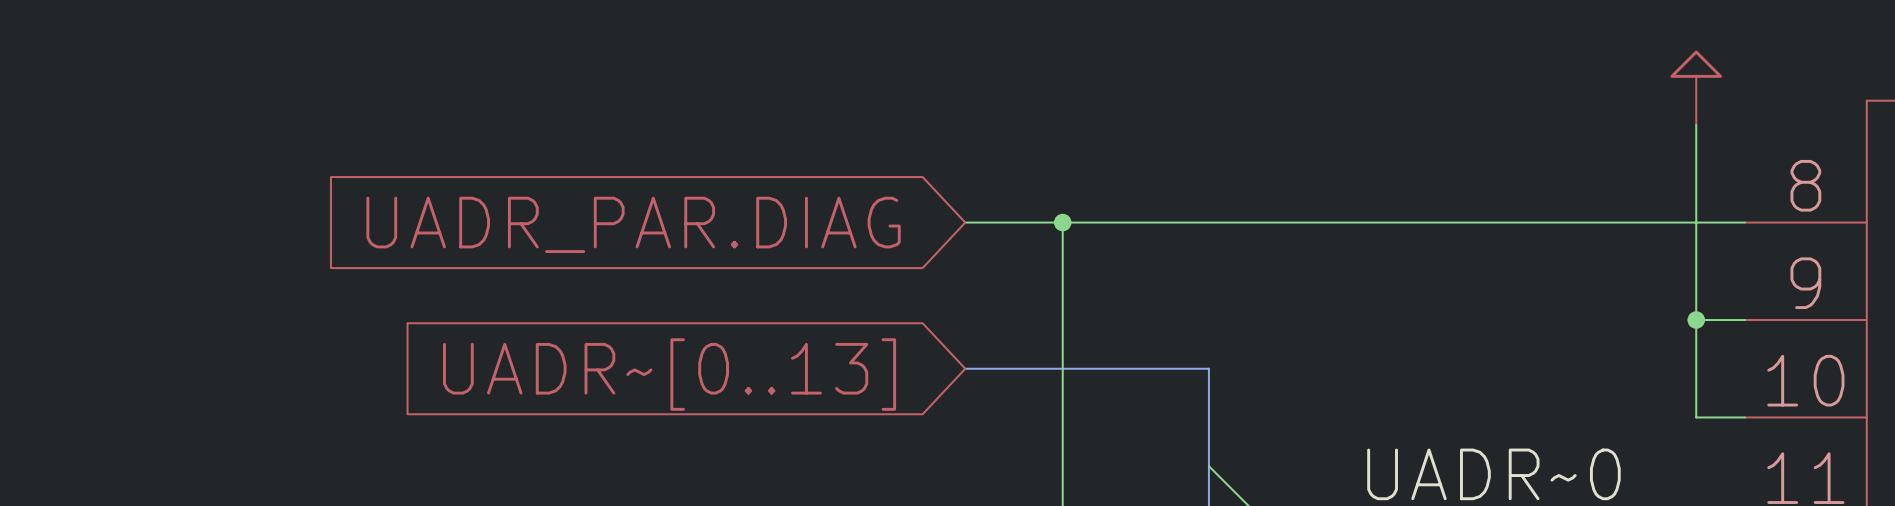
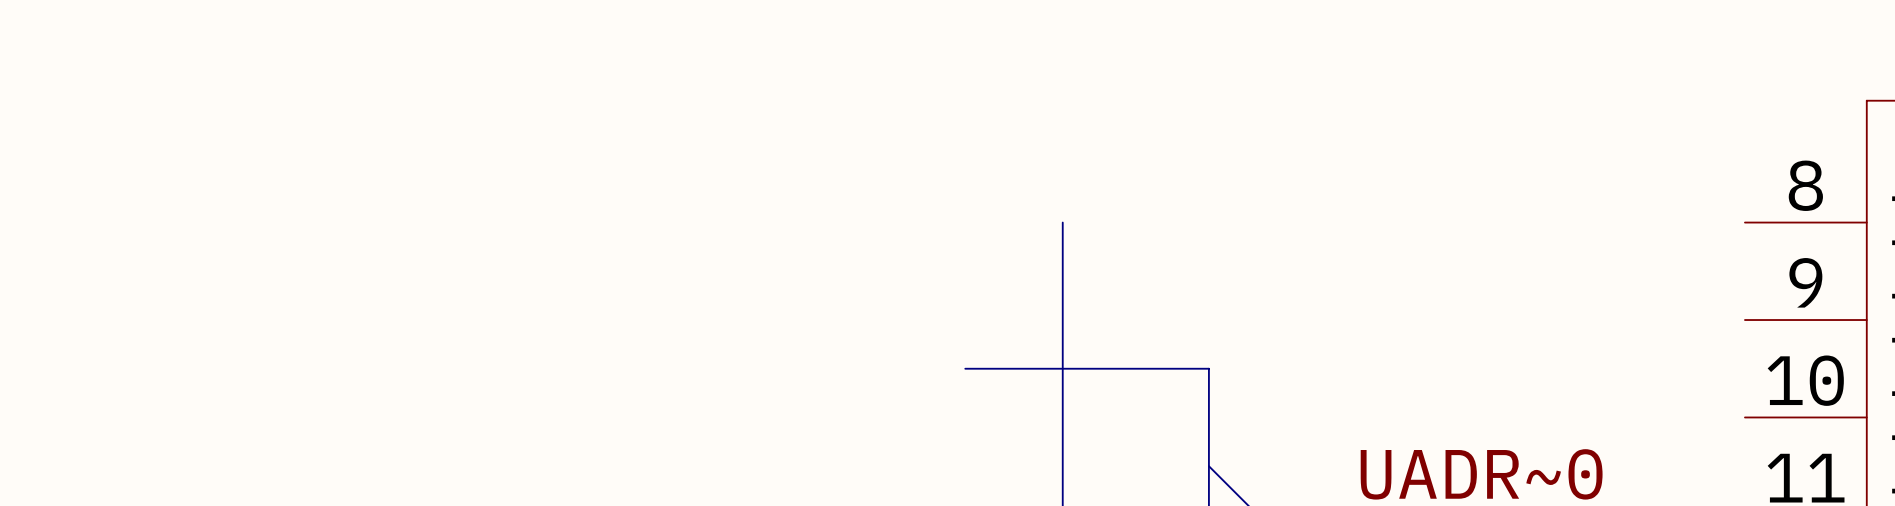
power symbol: (1696, 87) -> none
wire: (1696, 125) (1696, 417) (1744, 417) -> none
wire: (965, 222) (1744, 222) -> none
junction: (1062, 222) -> none
global label: UADR_PAR.DIAG (633, 224) -> none
wire: (1696, 320) (1744, 320) -> none
junction: (1696, 320) -> none
global label: UADR~[0..13] (669, 374) -> none

